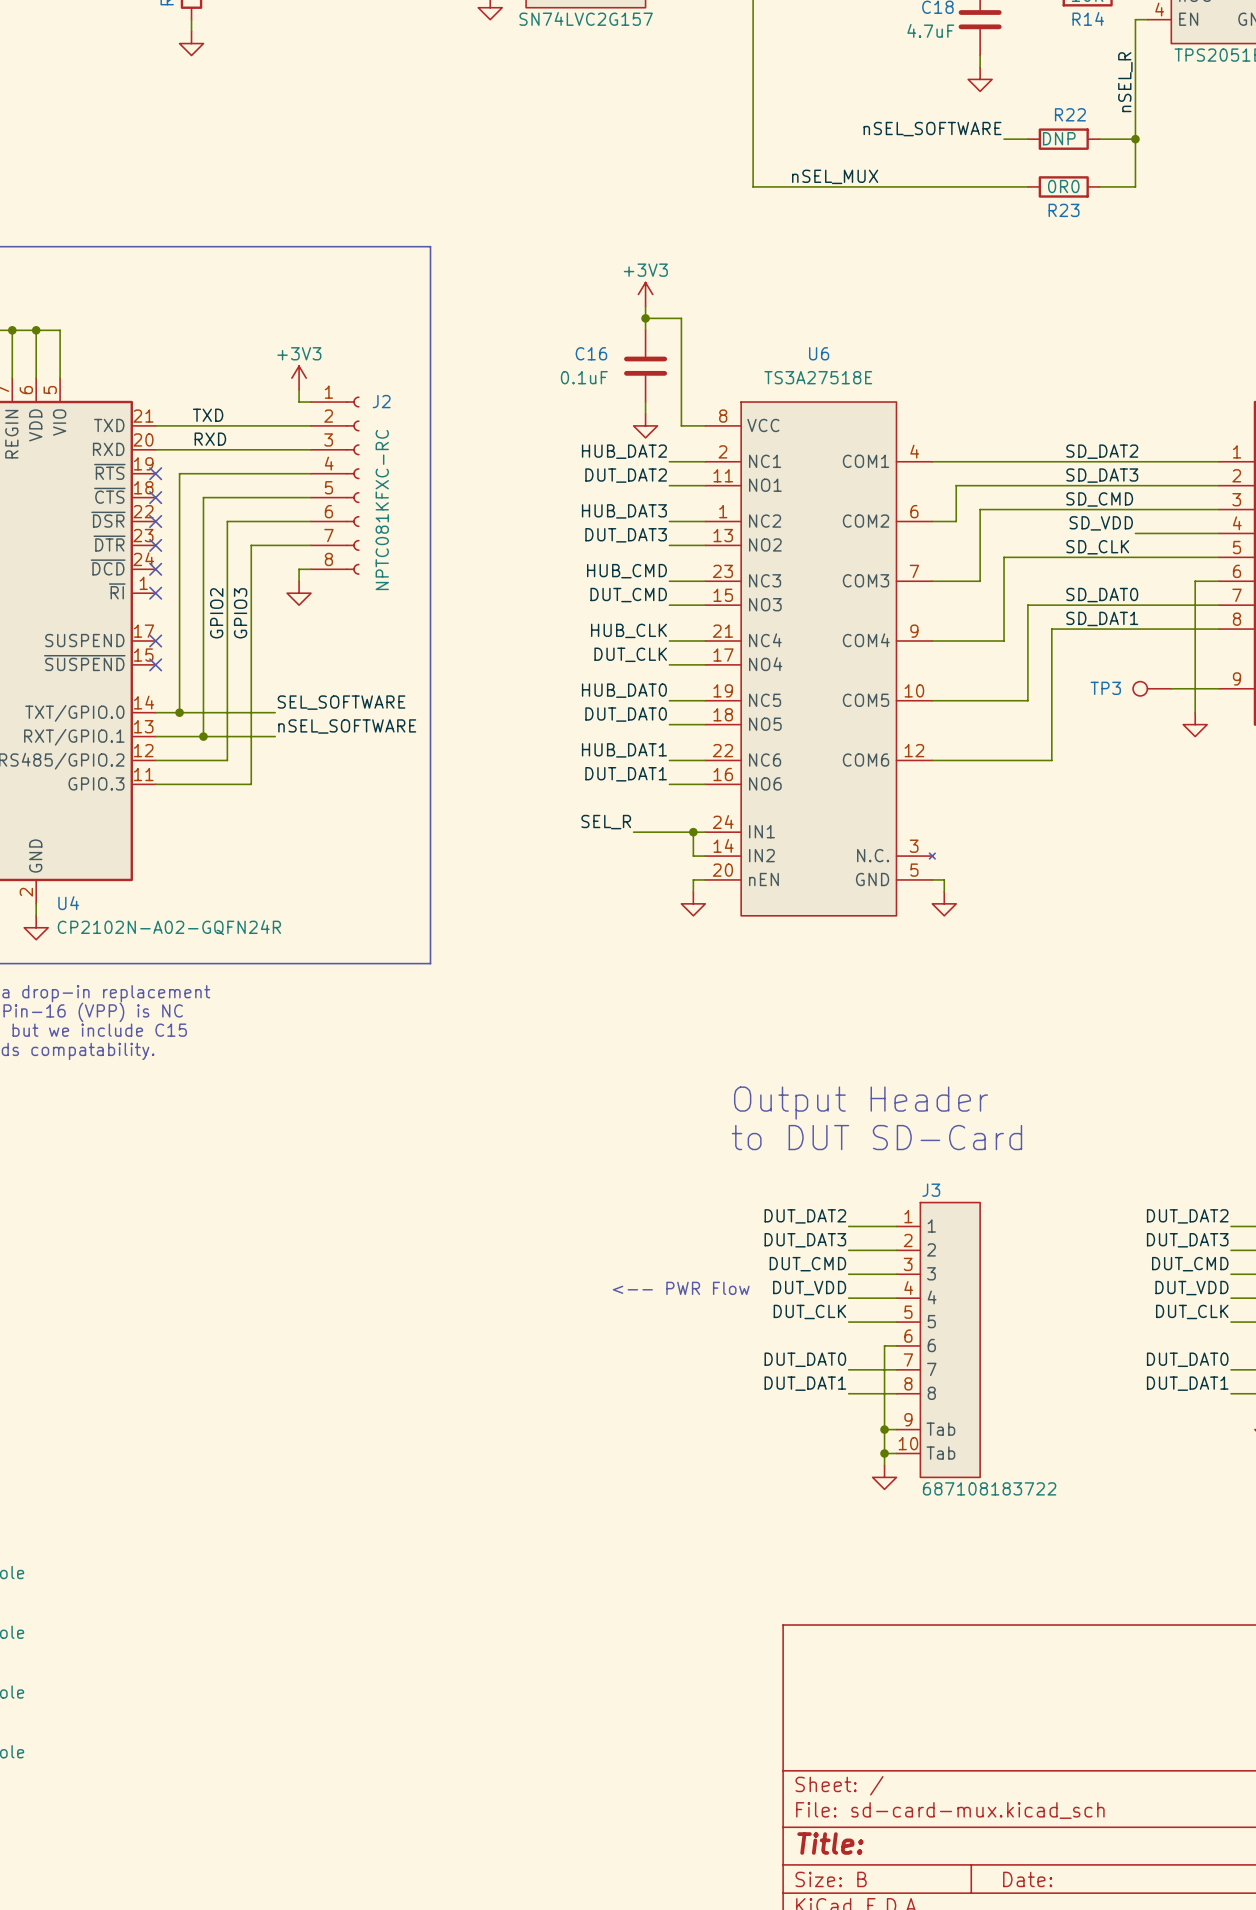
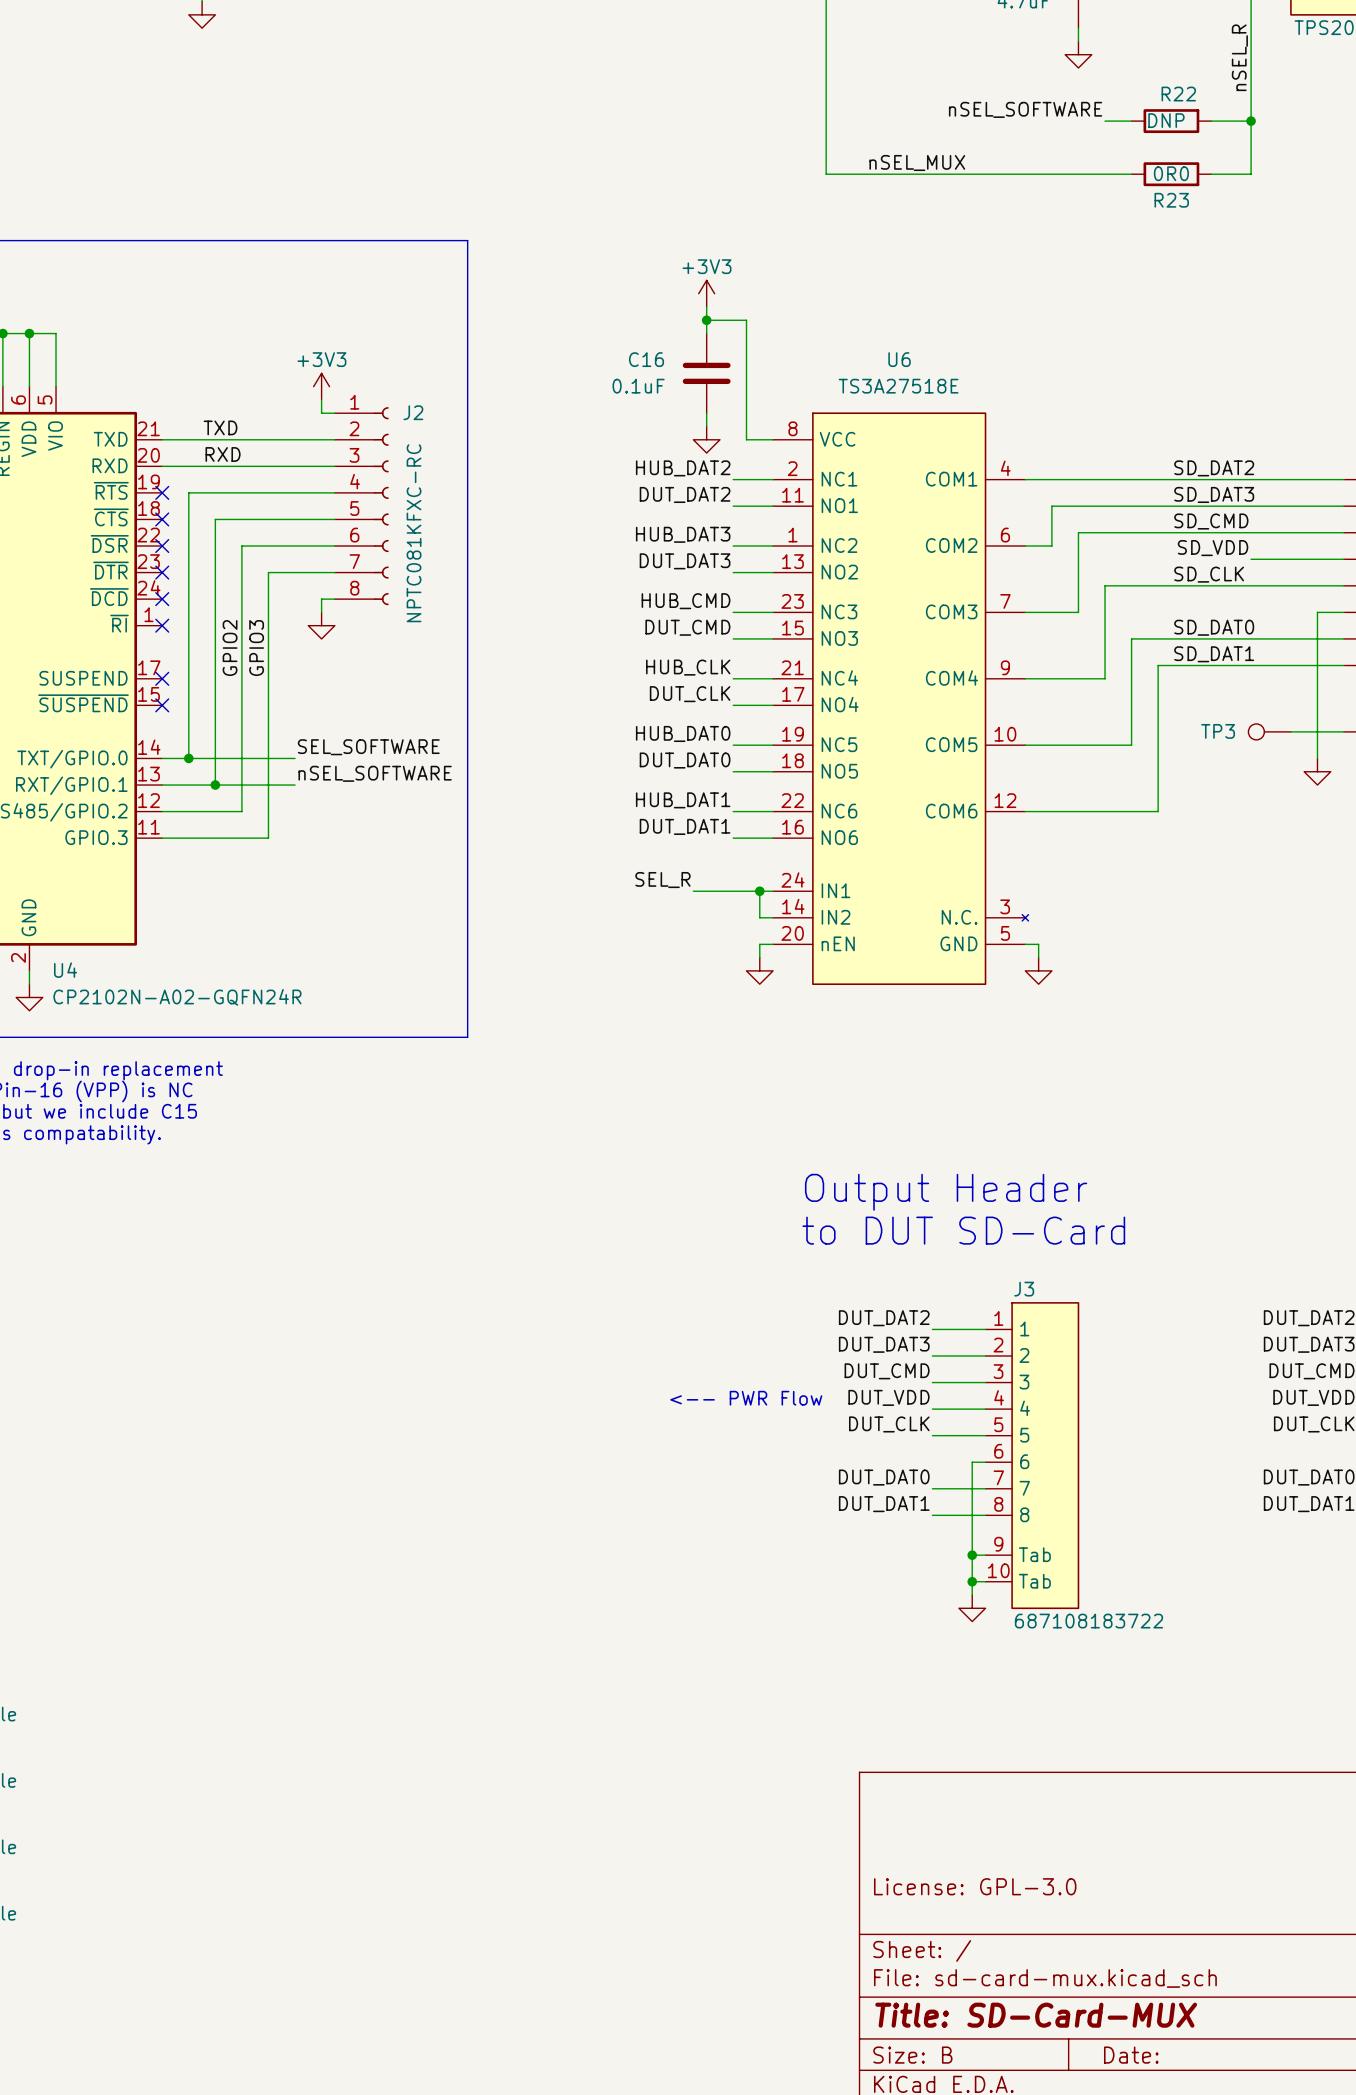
title block: none -> License: GPL-3.0 (975, 1886)
title block: Title: (830, 1843) -> Title: SD-Card-MUX (1036, 2015)

